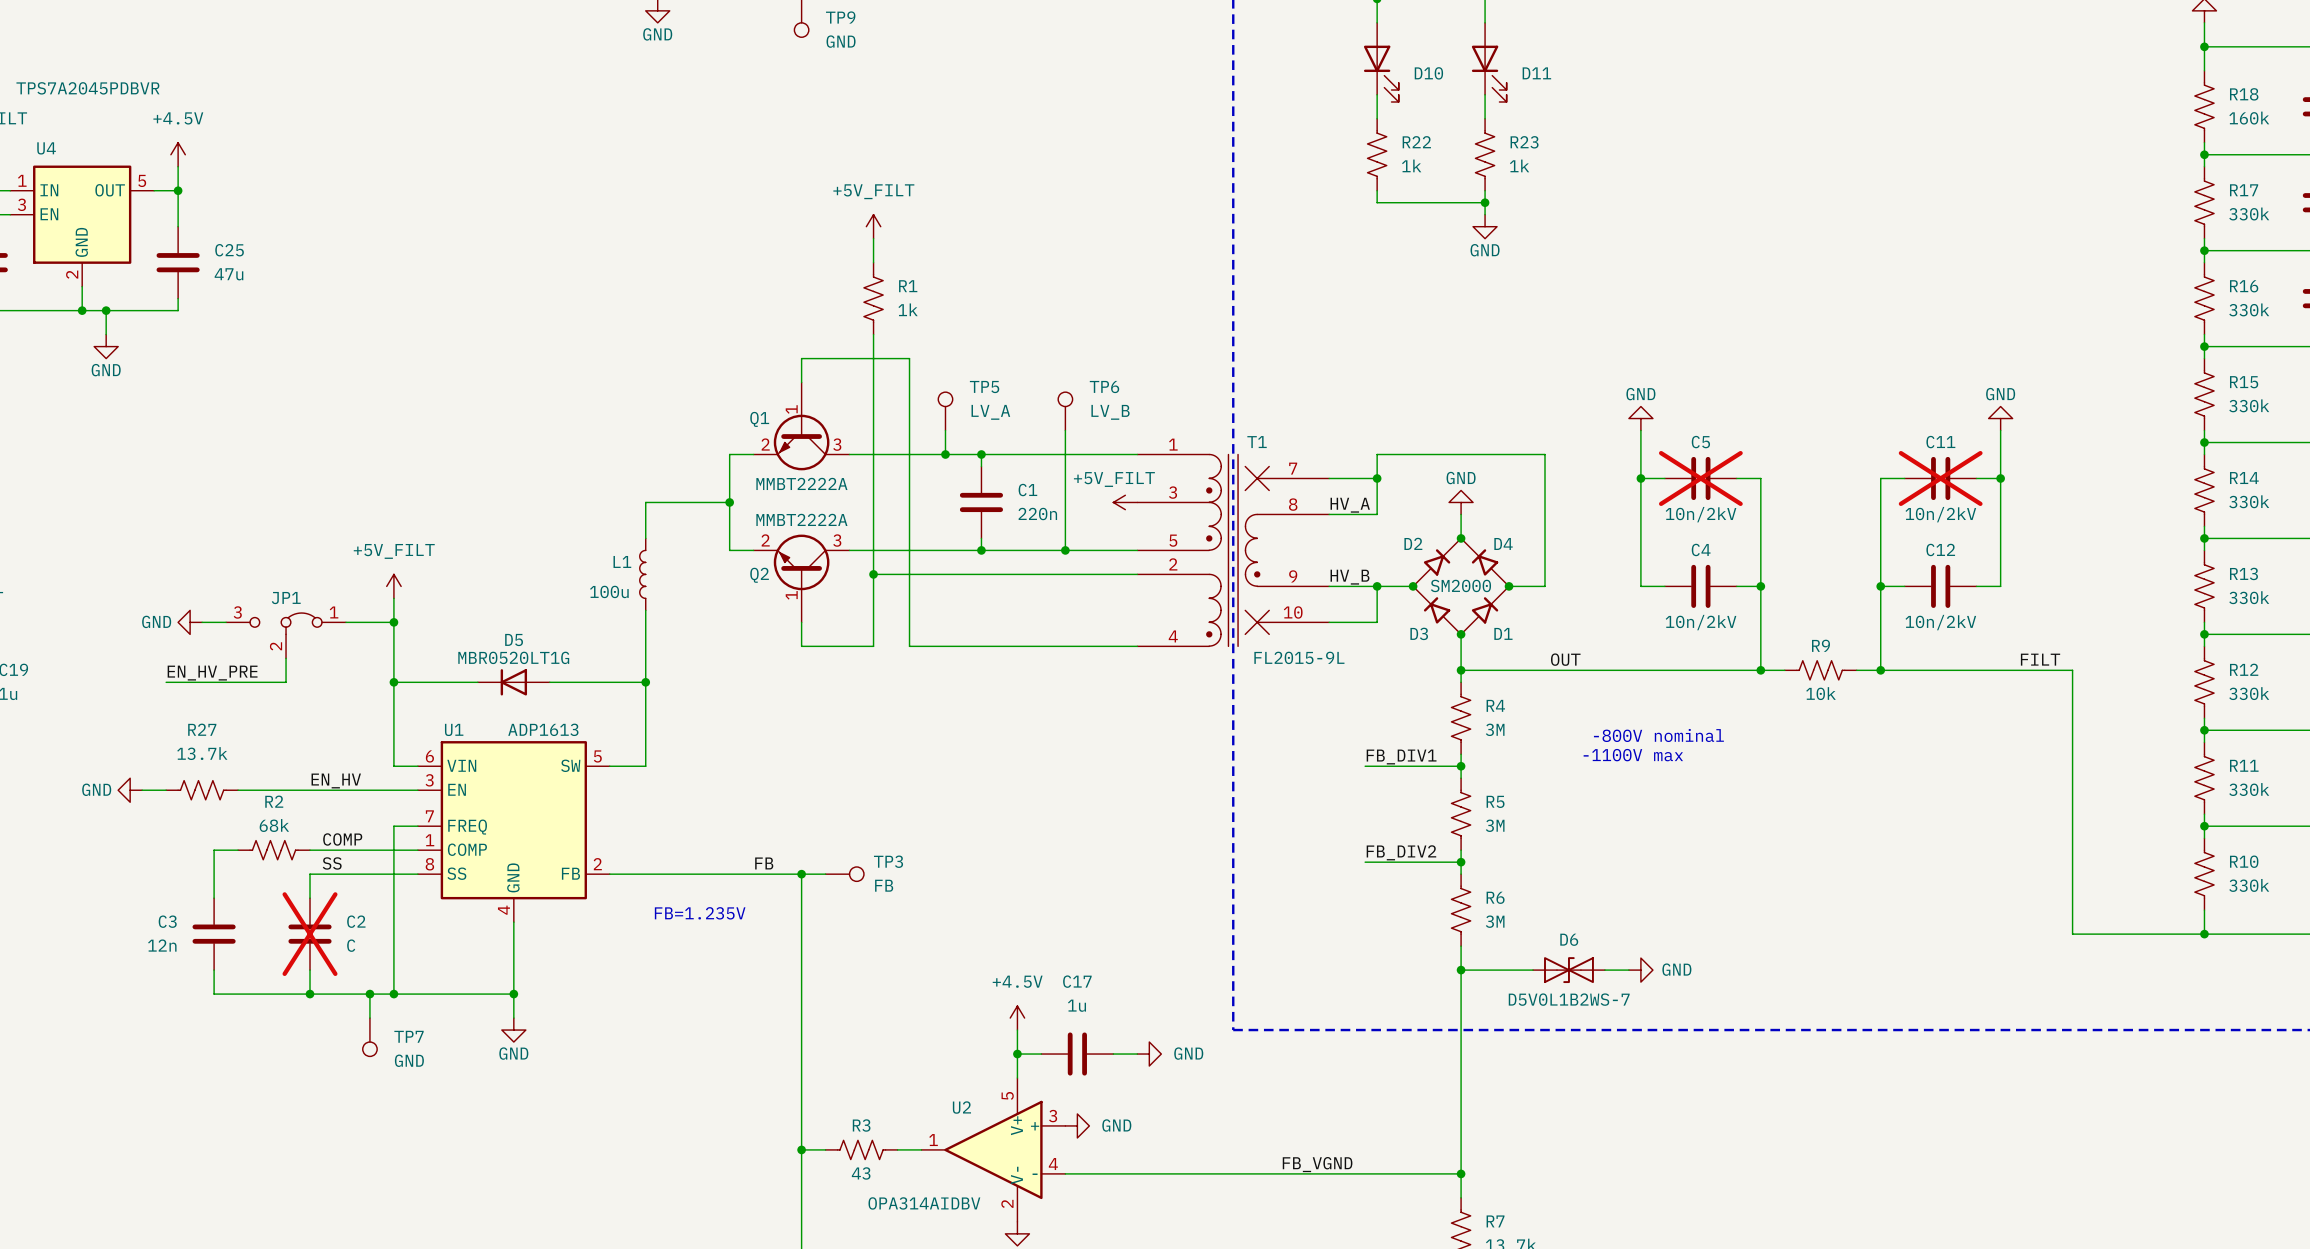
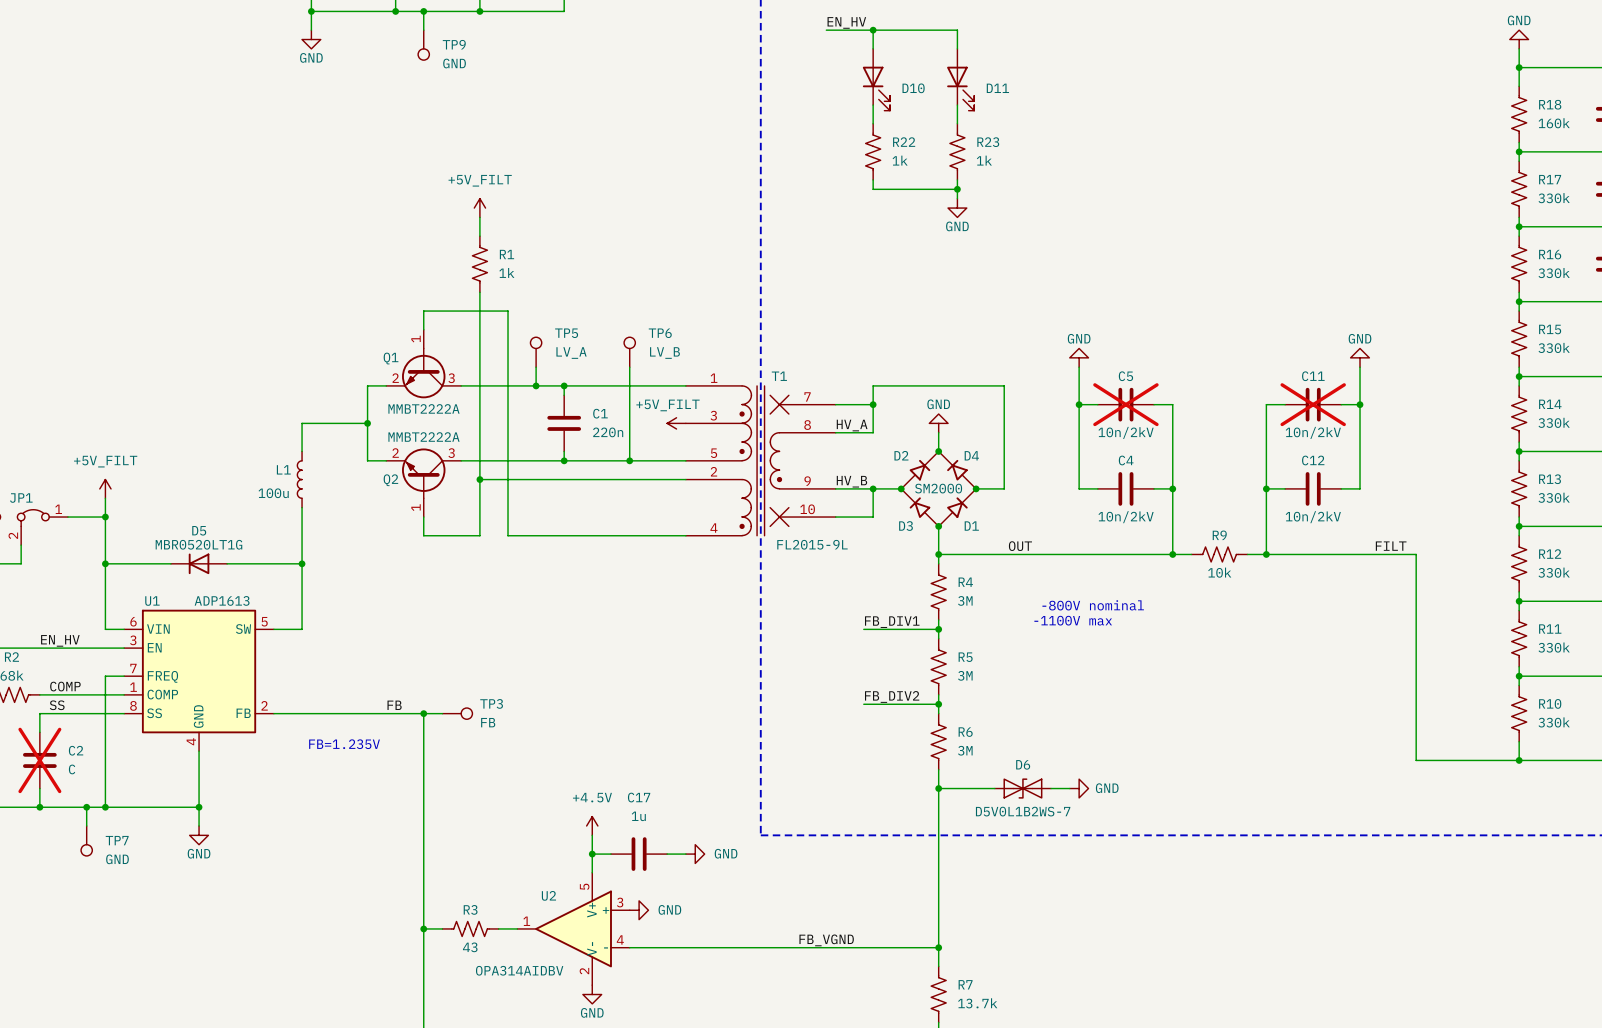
Q1 symbol: [753, 382, 850, 471] -> [386, 329, 462, 399]
Q2 symbol: [753, 534, 850, 623] -> [386, 448, 462, 518]

